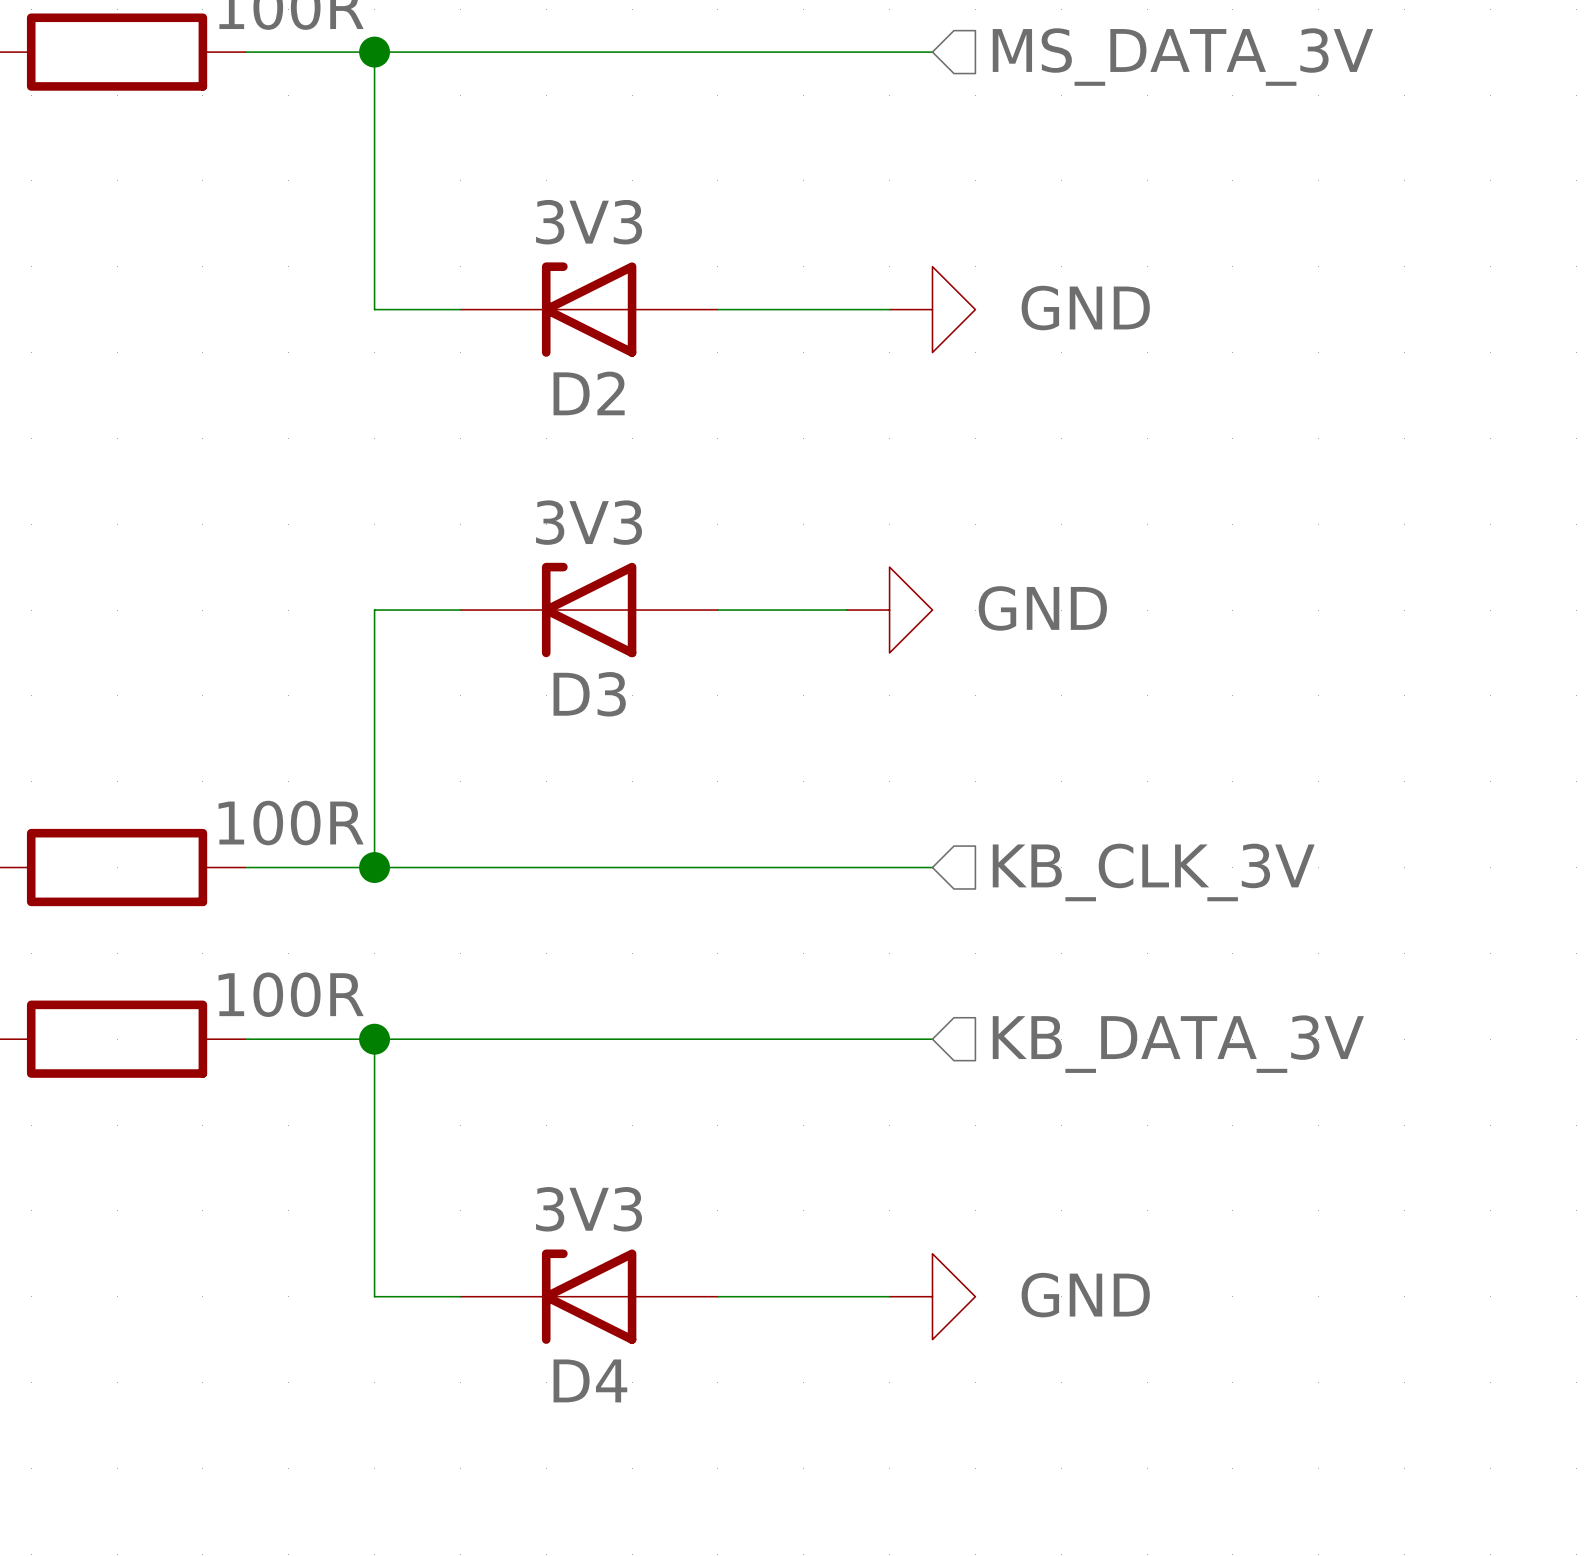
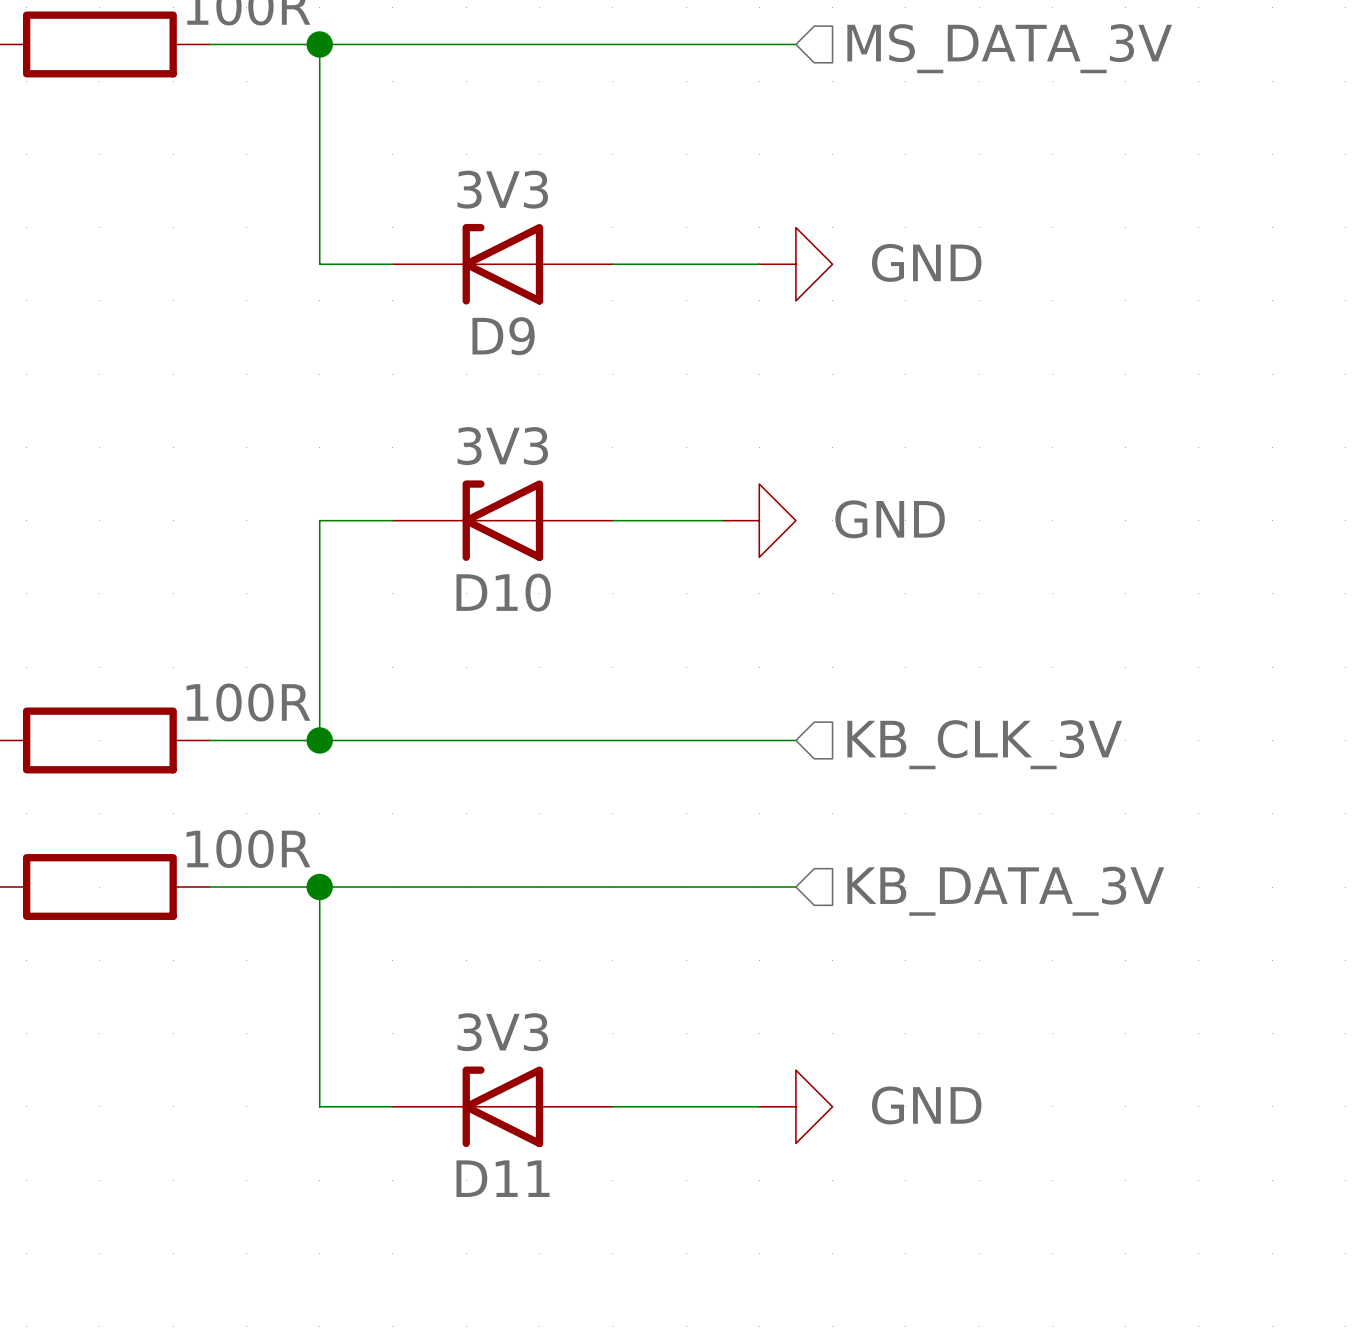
D2 name: D2 (589, 393) -> D9 (503, 336)
D3 name: D3 (589, 694) -> D10 (503, 592)
D4 name: D4 (590, 1380) -> D11 (503, 1178)

